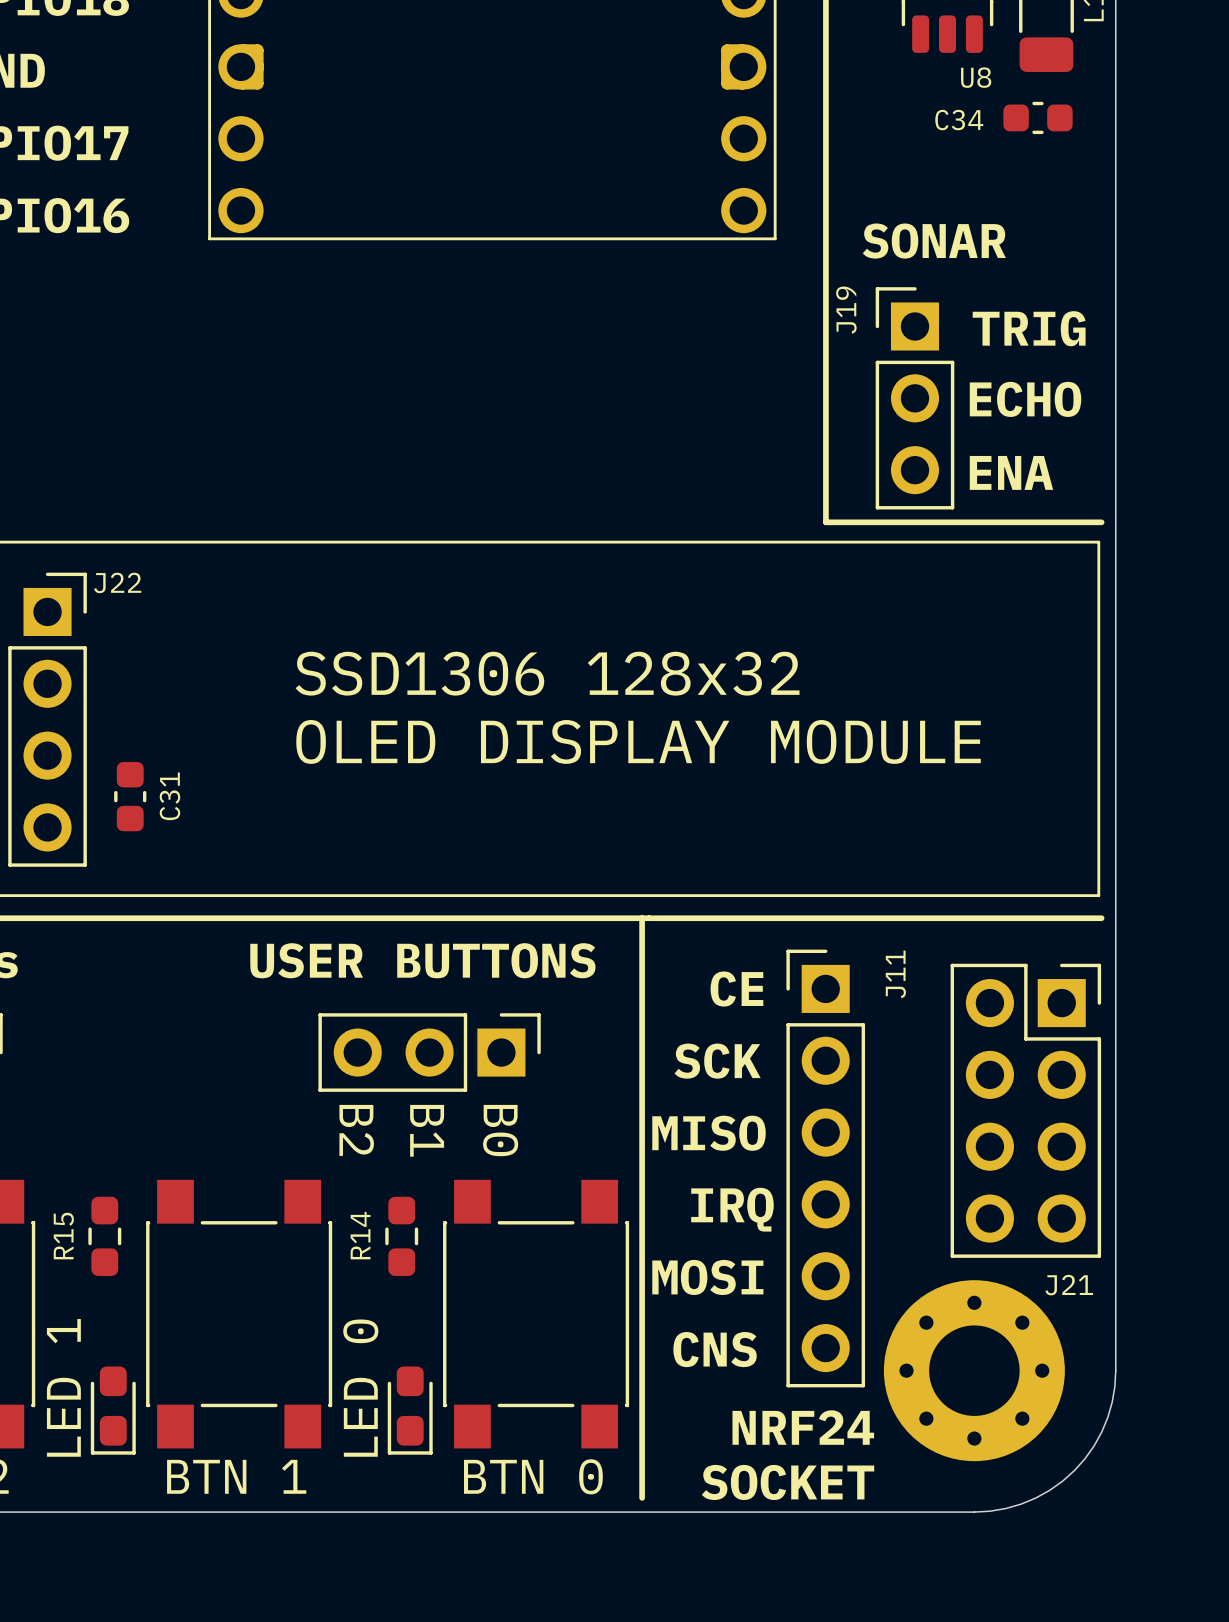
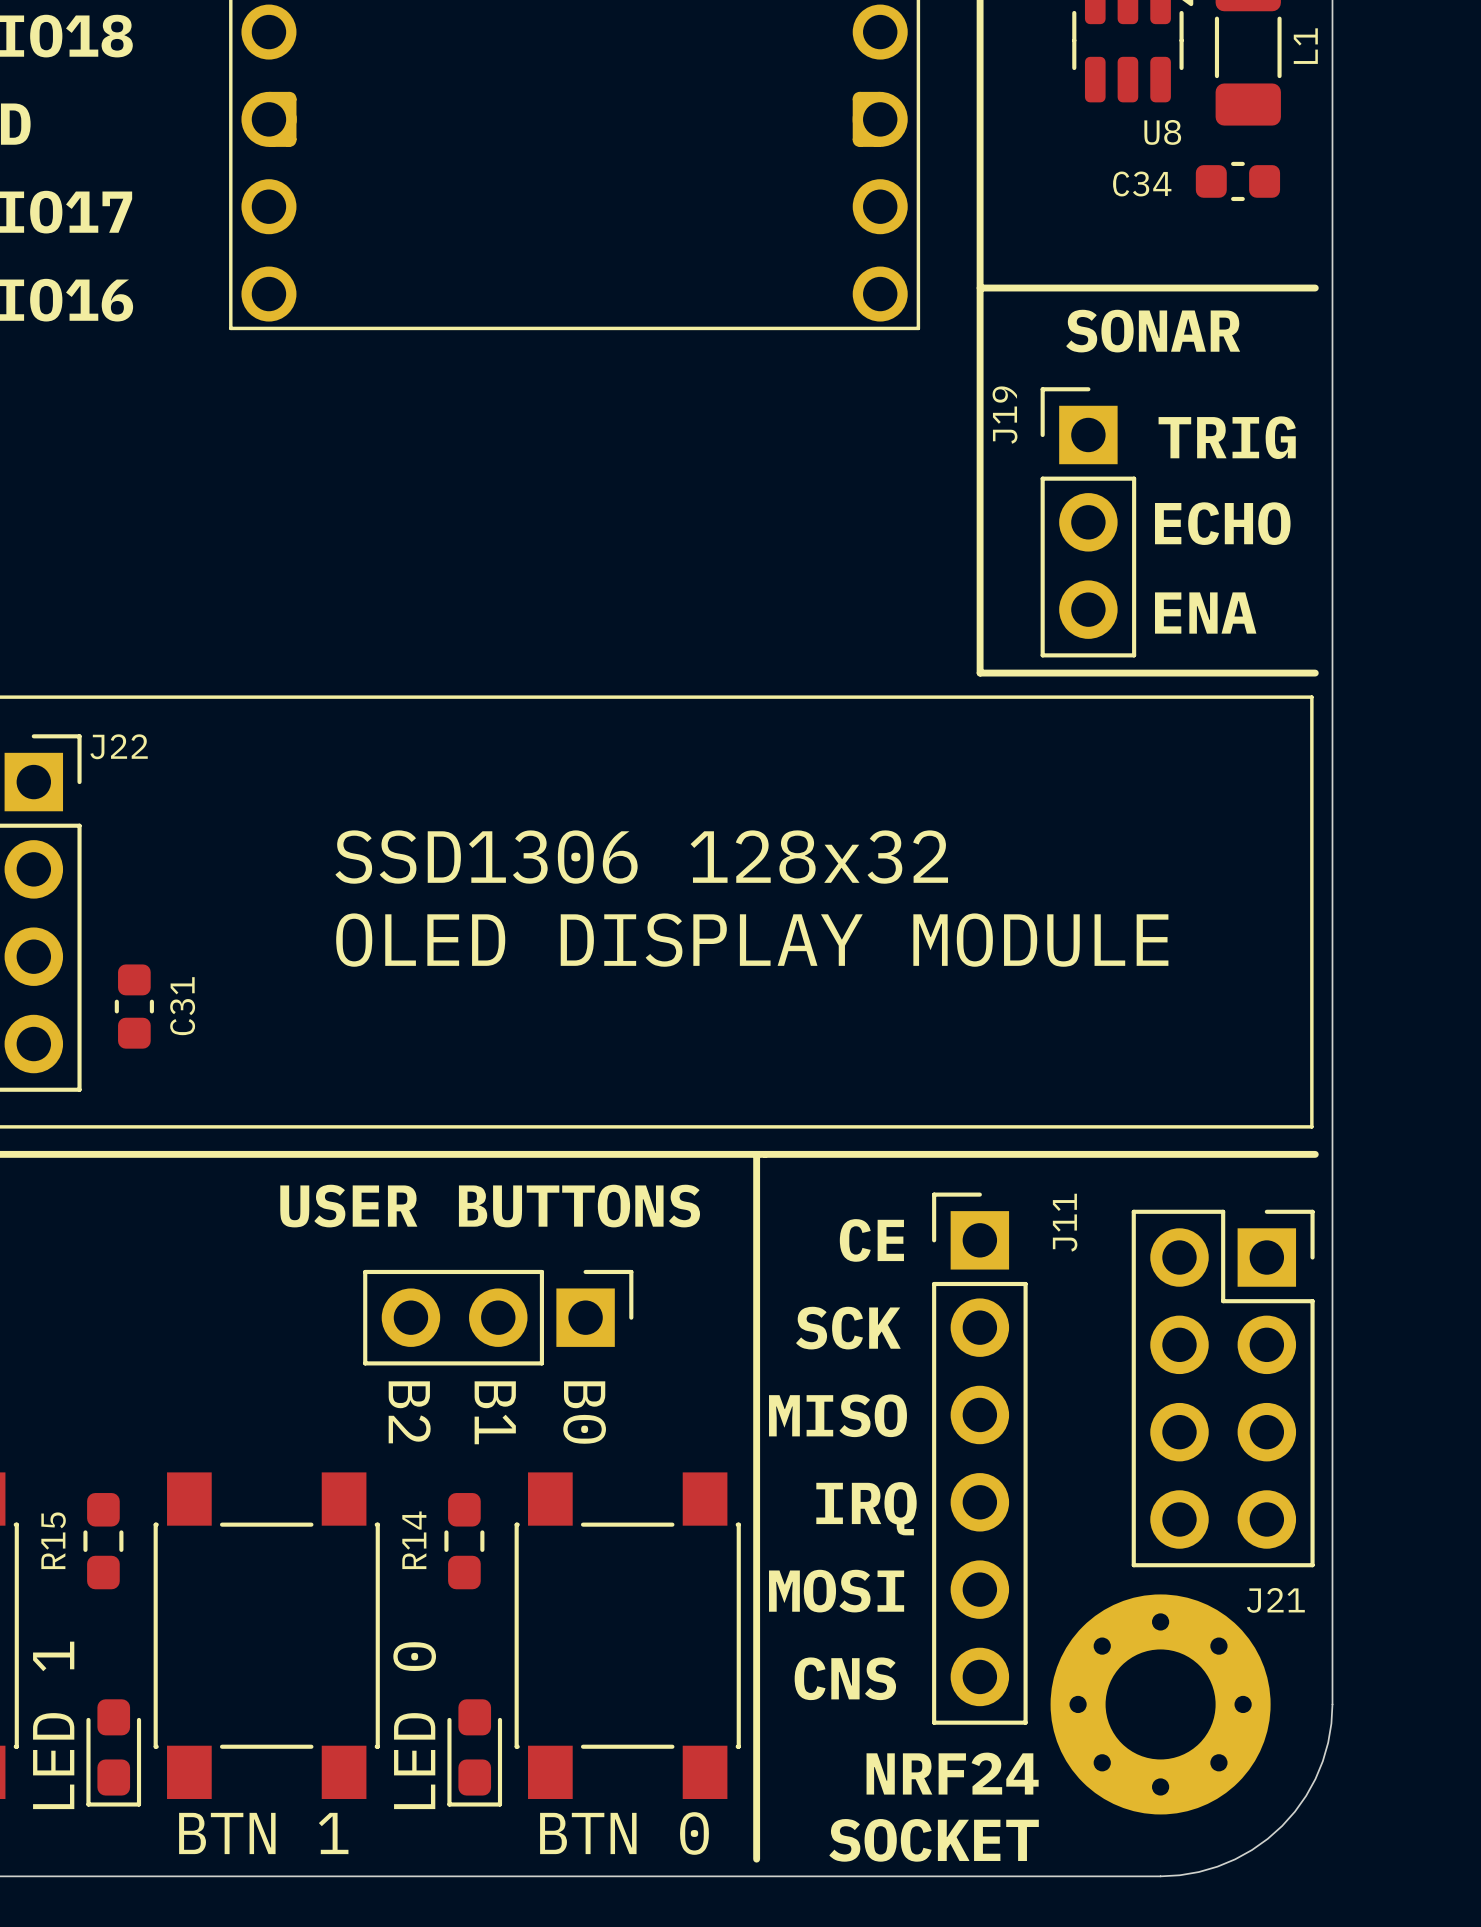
line: none -> (980, 288) (1315, 288)
text position: SONAR (934, 241) -> SONAR (1153, 331)

